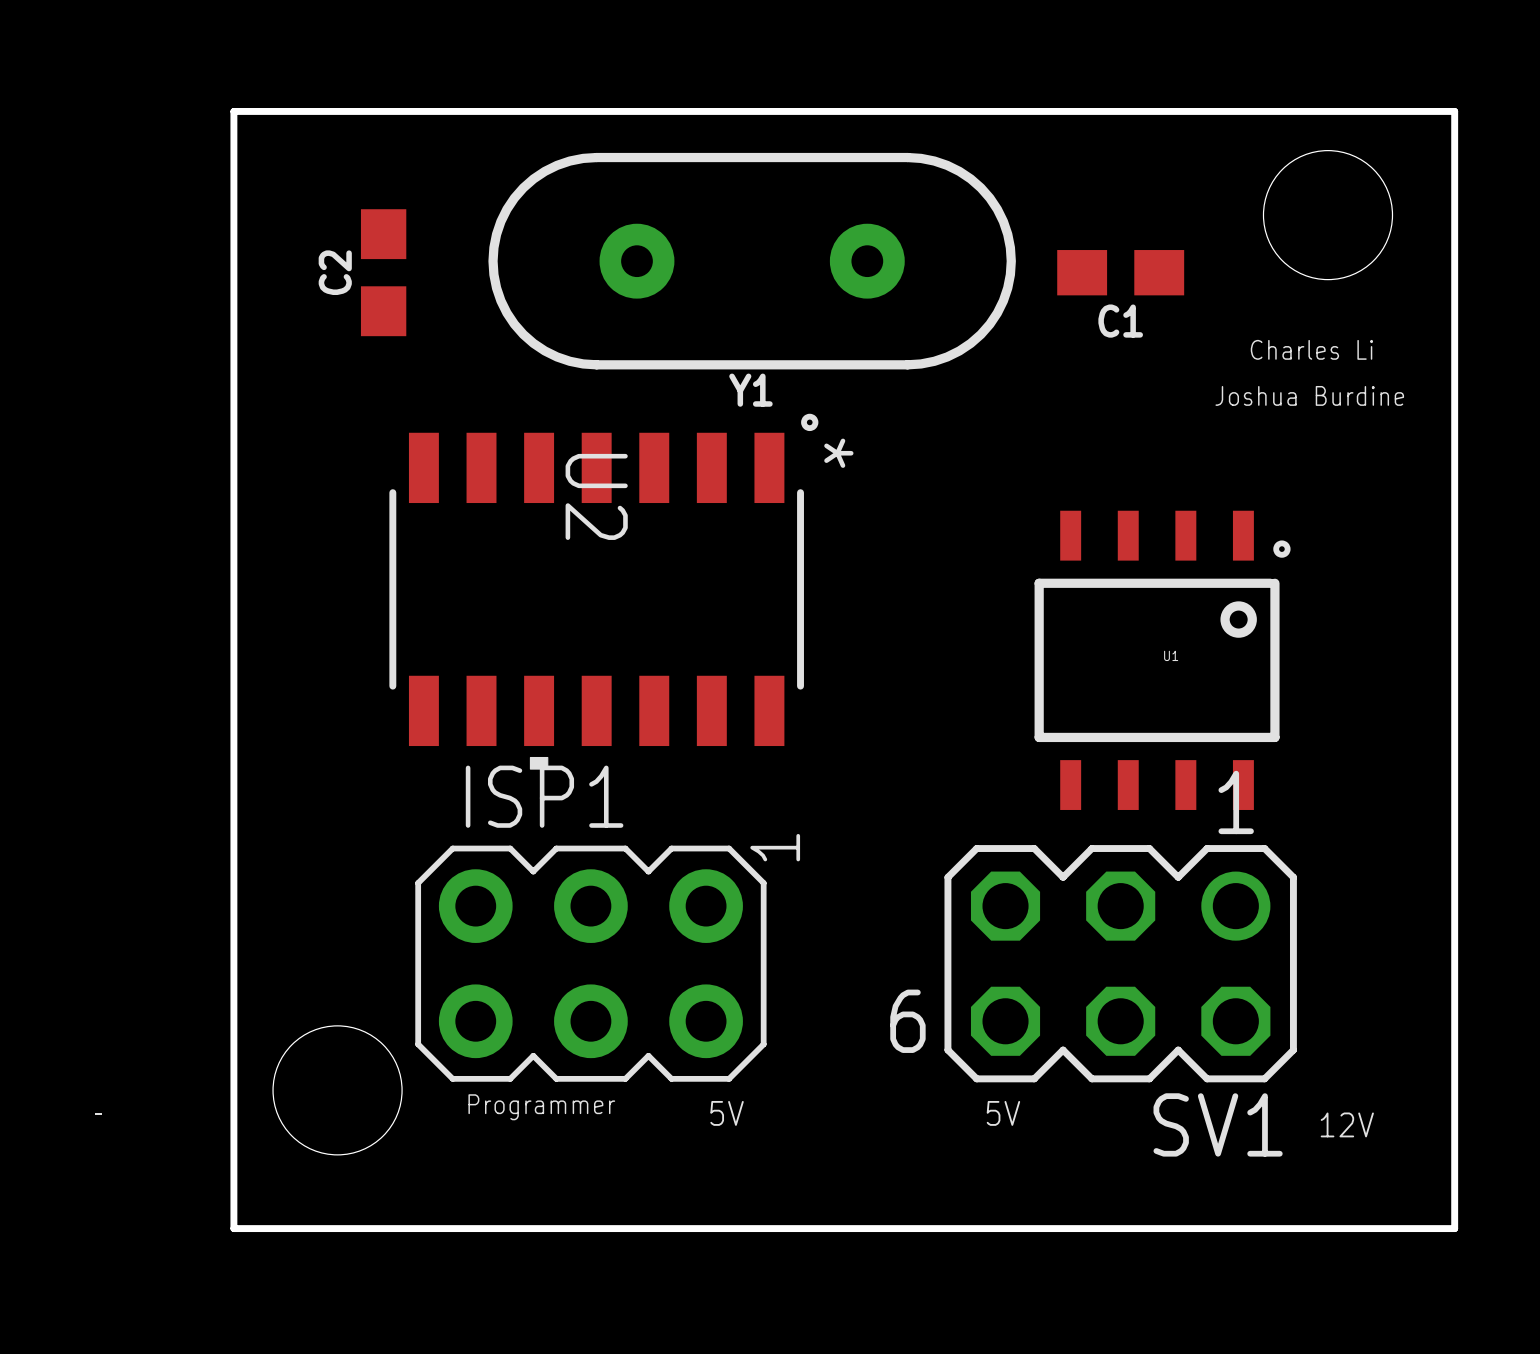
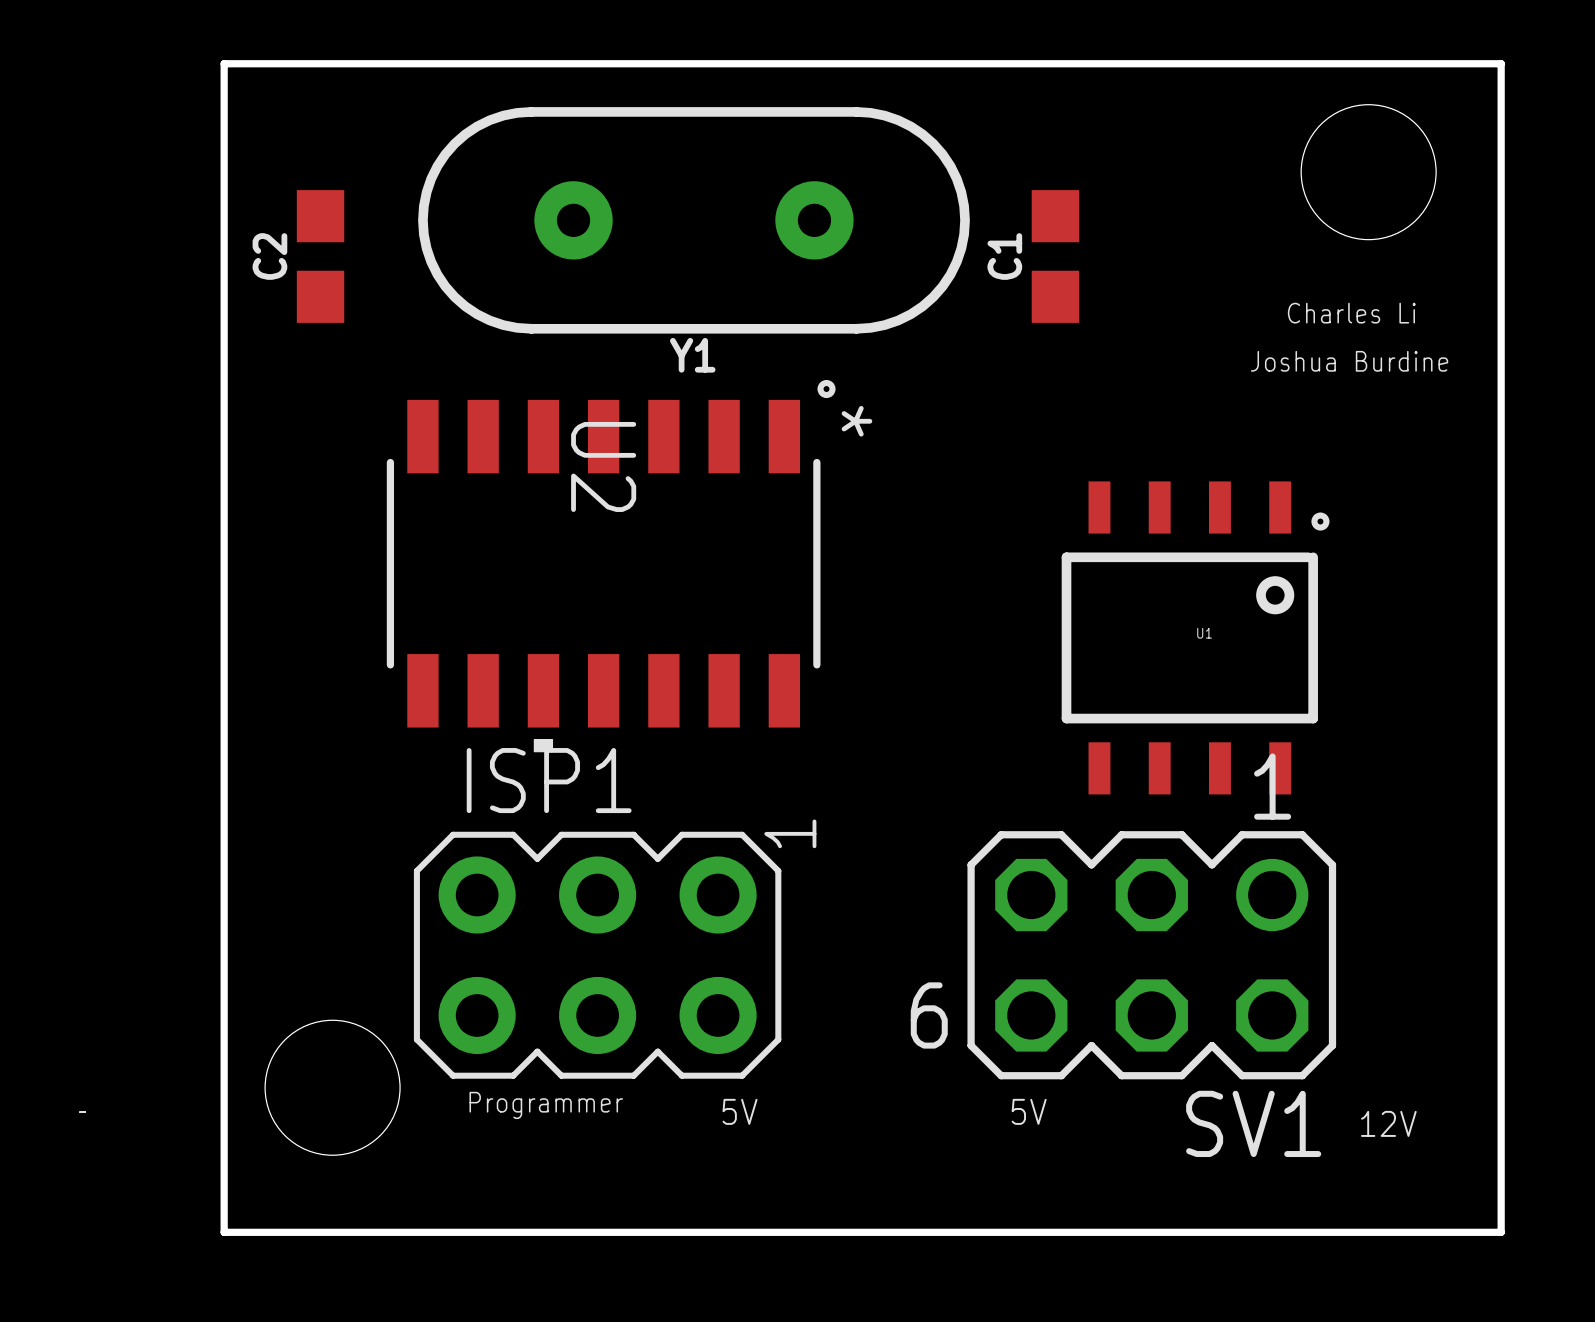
Y1 position: (752, 261) -> (694, 220)
C2 position: (383, 272) -> (320, 256)
C1 rotation: 0° (1120, 272) -> 90° clockwise (1055, 256)
C1 position: (1120, 272) -> (1055, 256)

